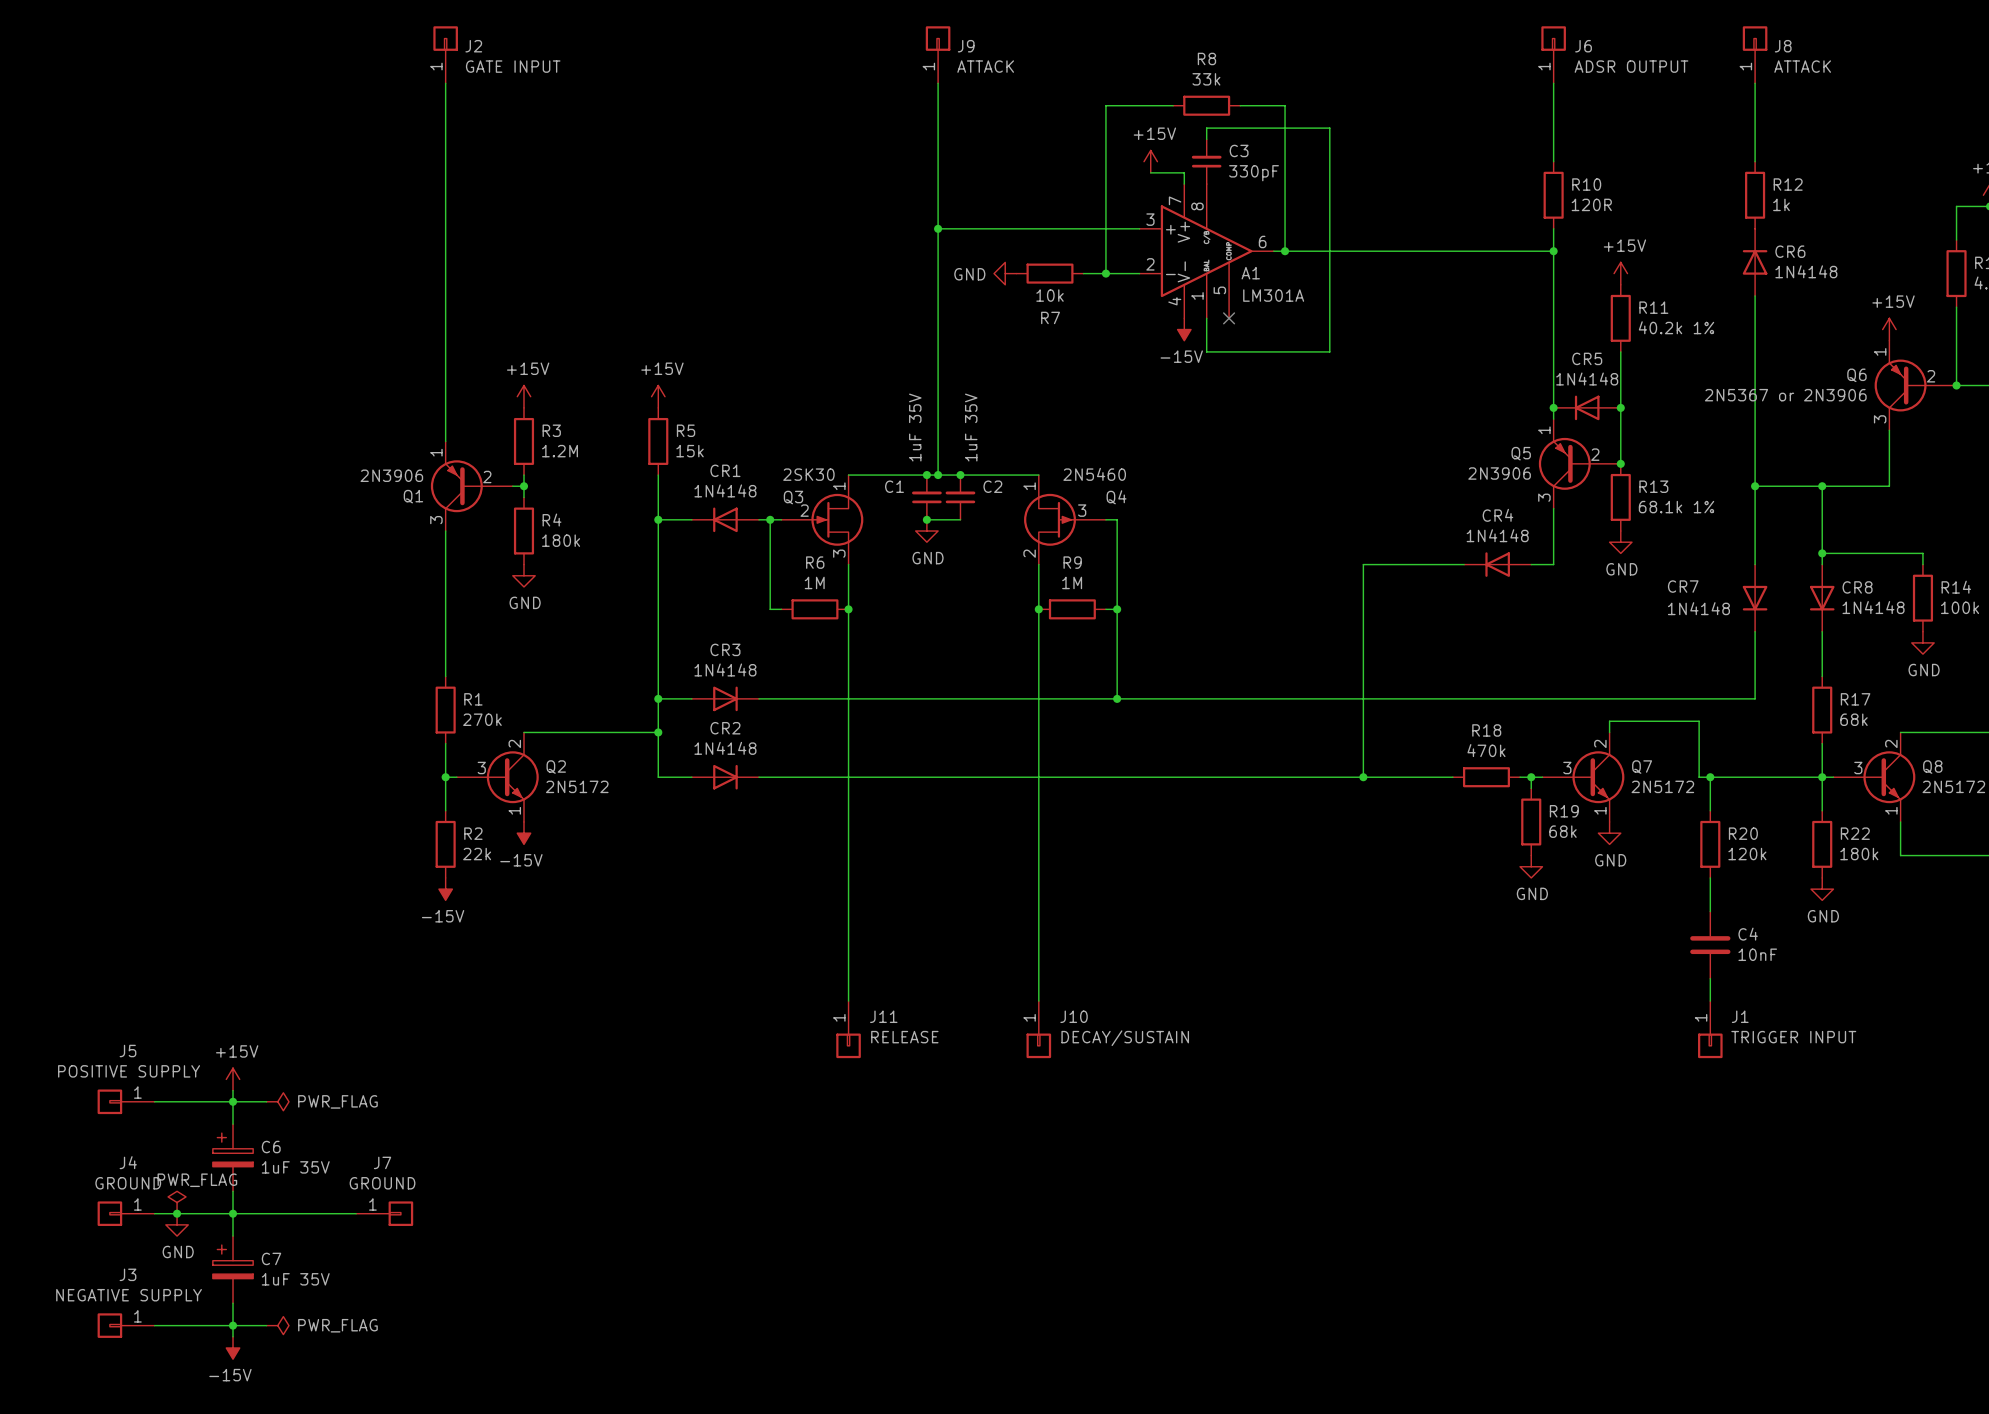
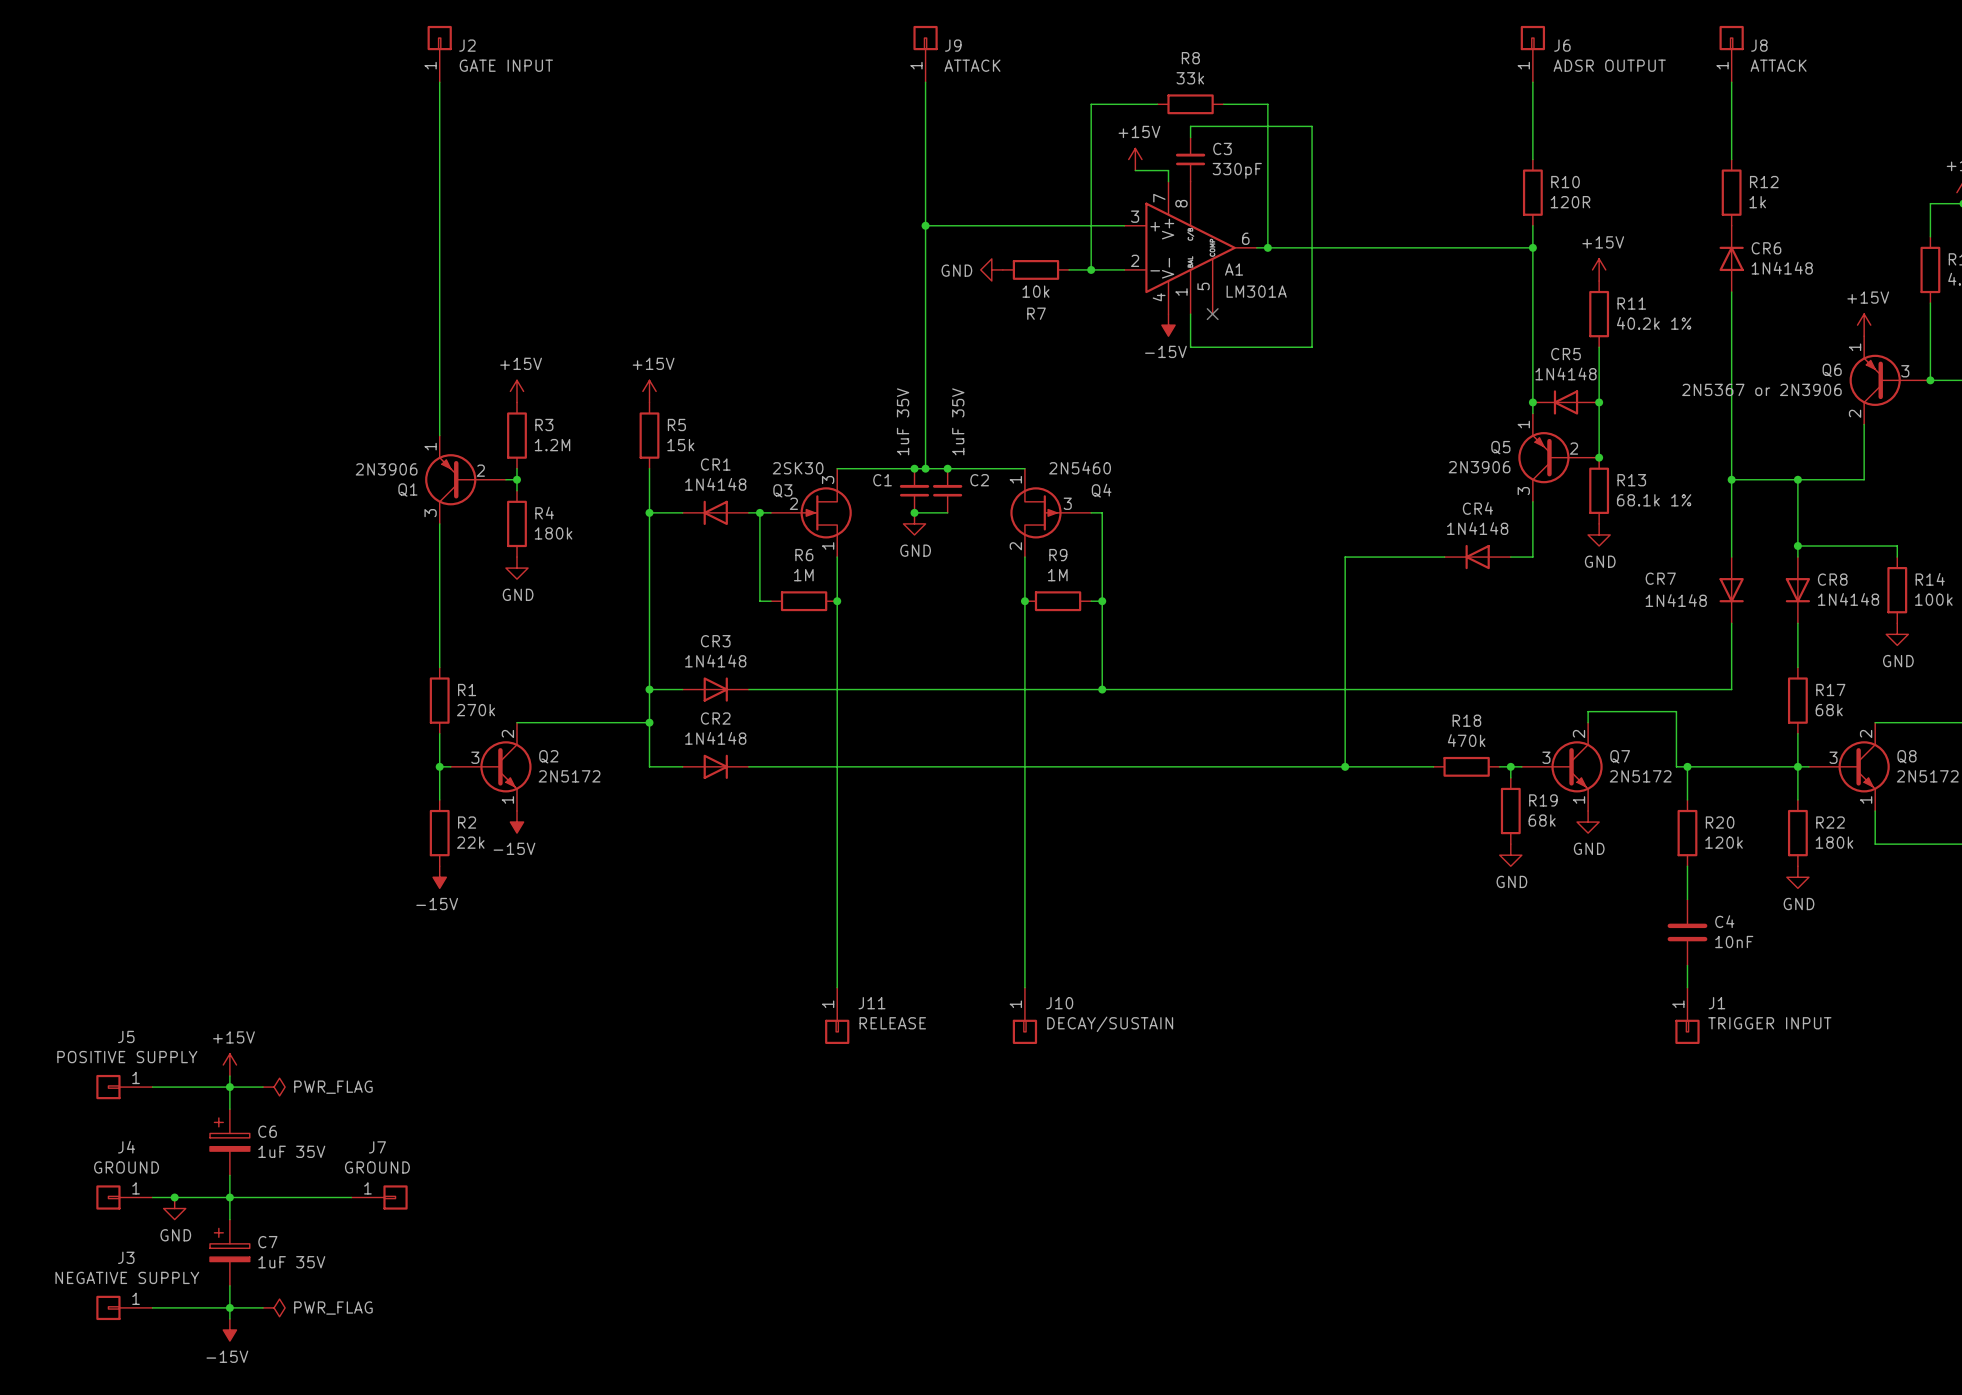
Q6 pin number: 2 (1931, 376) -> 3 (1905, 371)
Q6 pin number: 3 (1880, 419) -> 2 (1855, 413)
Q3 pin number: 1 (839, 486) -> 3 (828, 480)
Q3 pin number: 3 (839, 553) -> 1 (828, 546)
power symbol: PWR_FLAG (177, 1202) -> none

